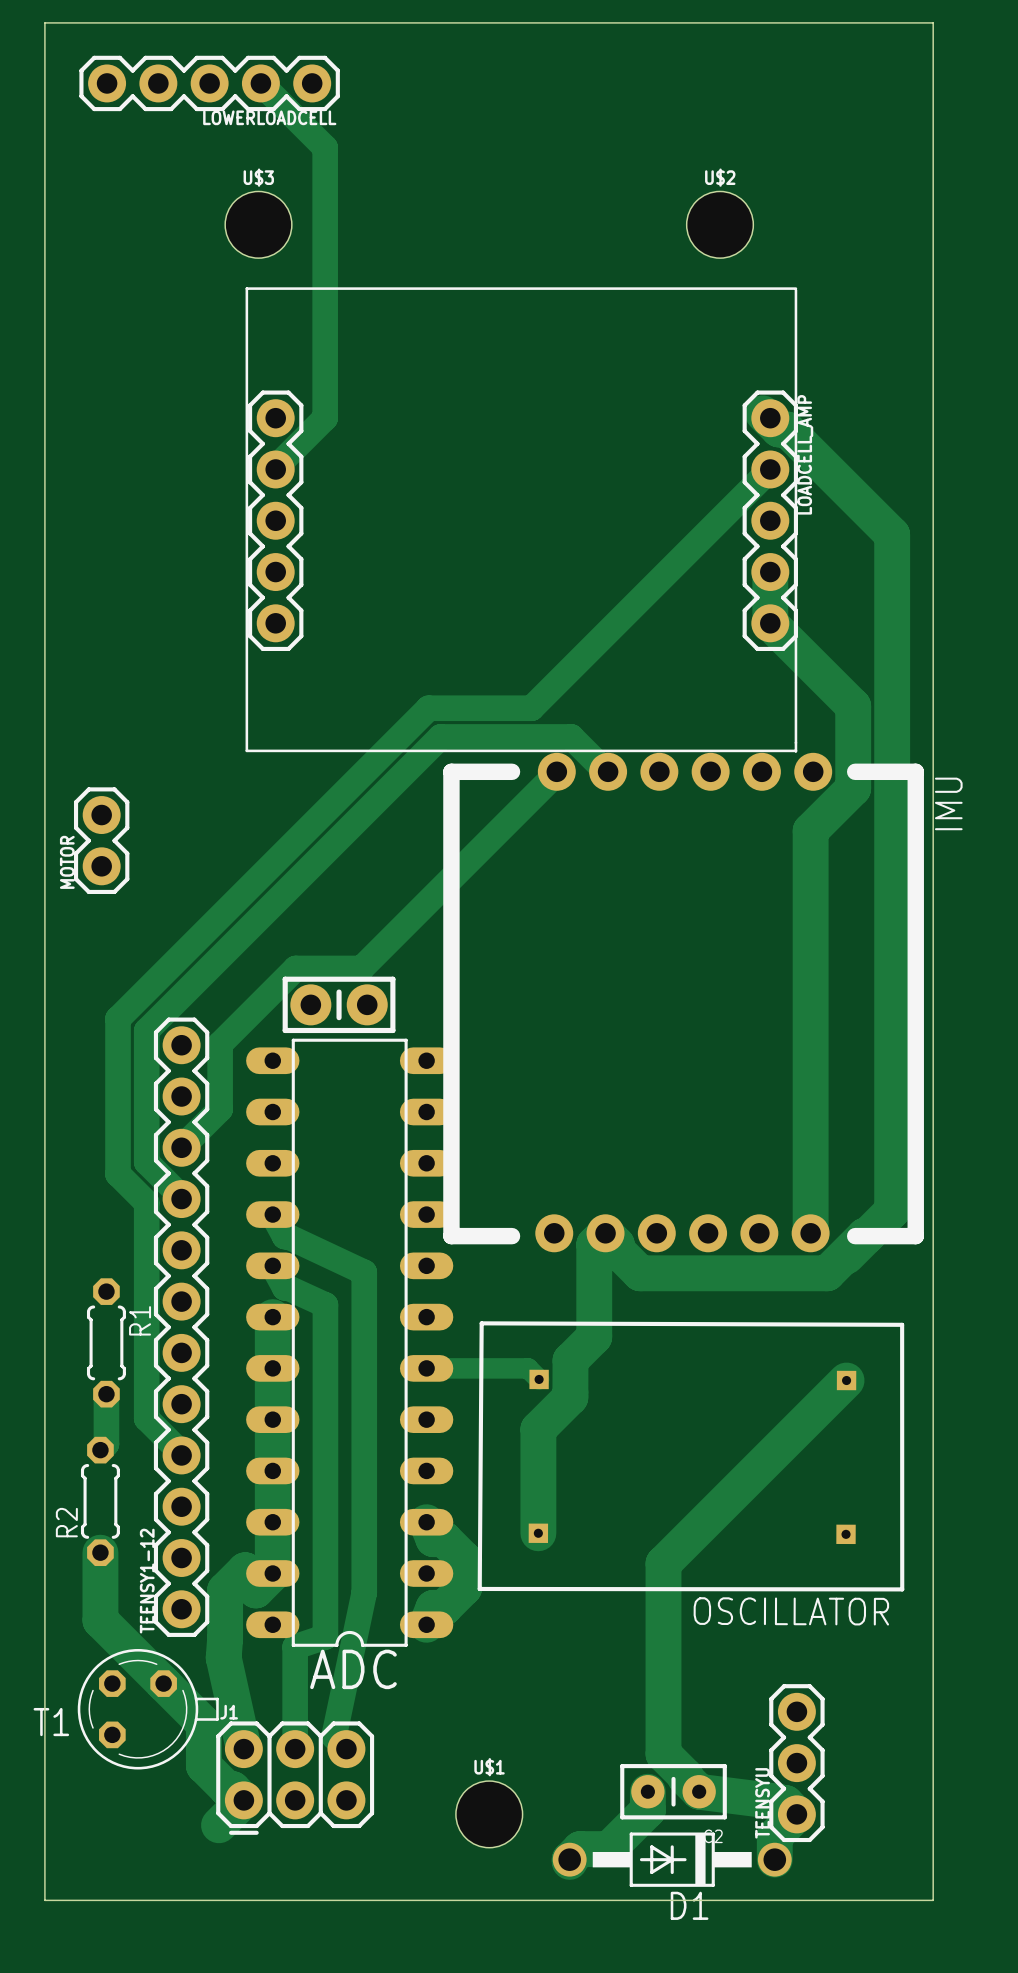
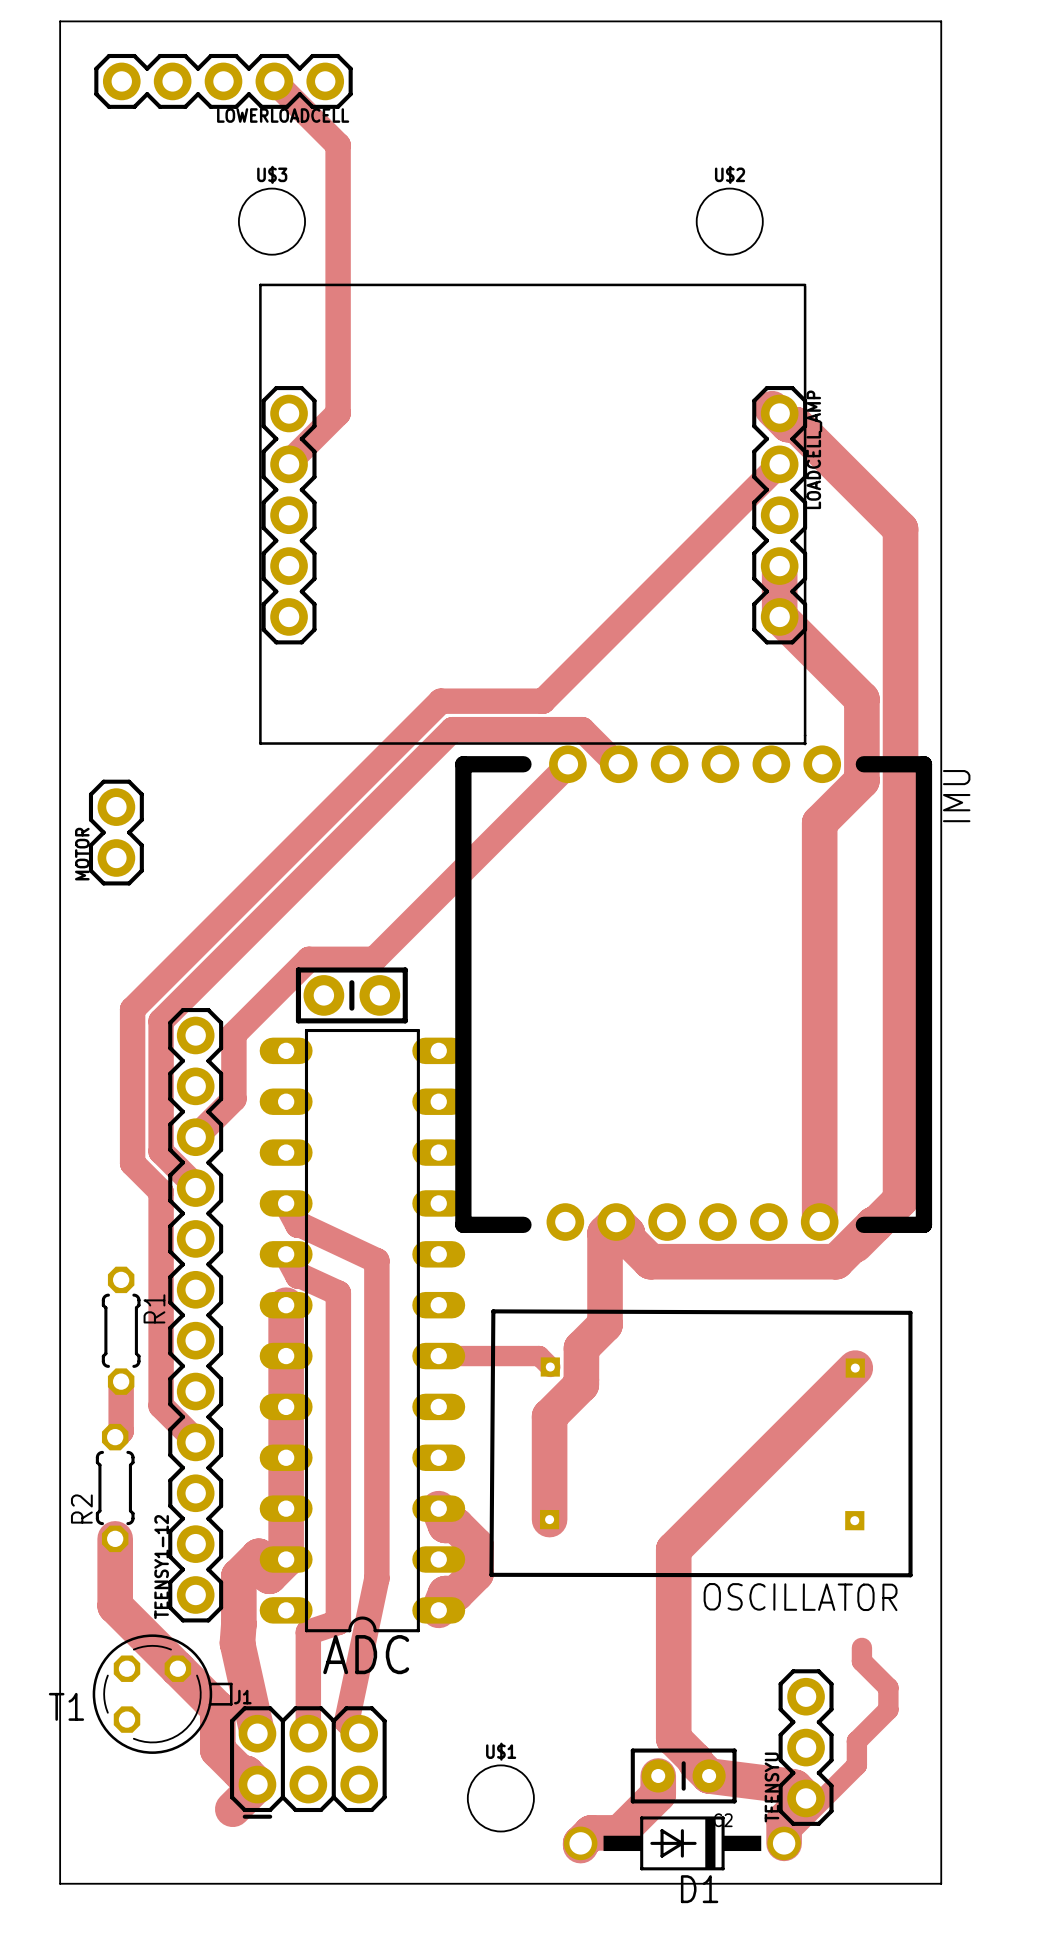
track: none -> (861, 1647) (861, 1661) (888, 1687) (888, 1709) (856, 1741) (856, 1765) (788, 1833)

